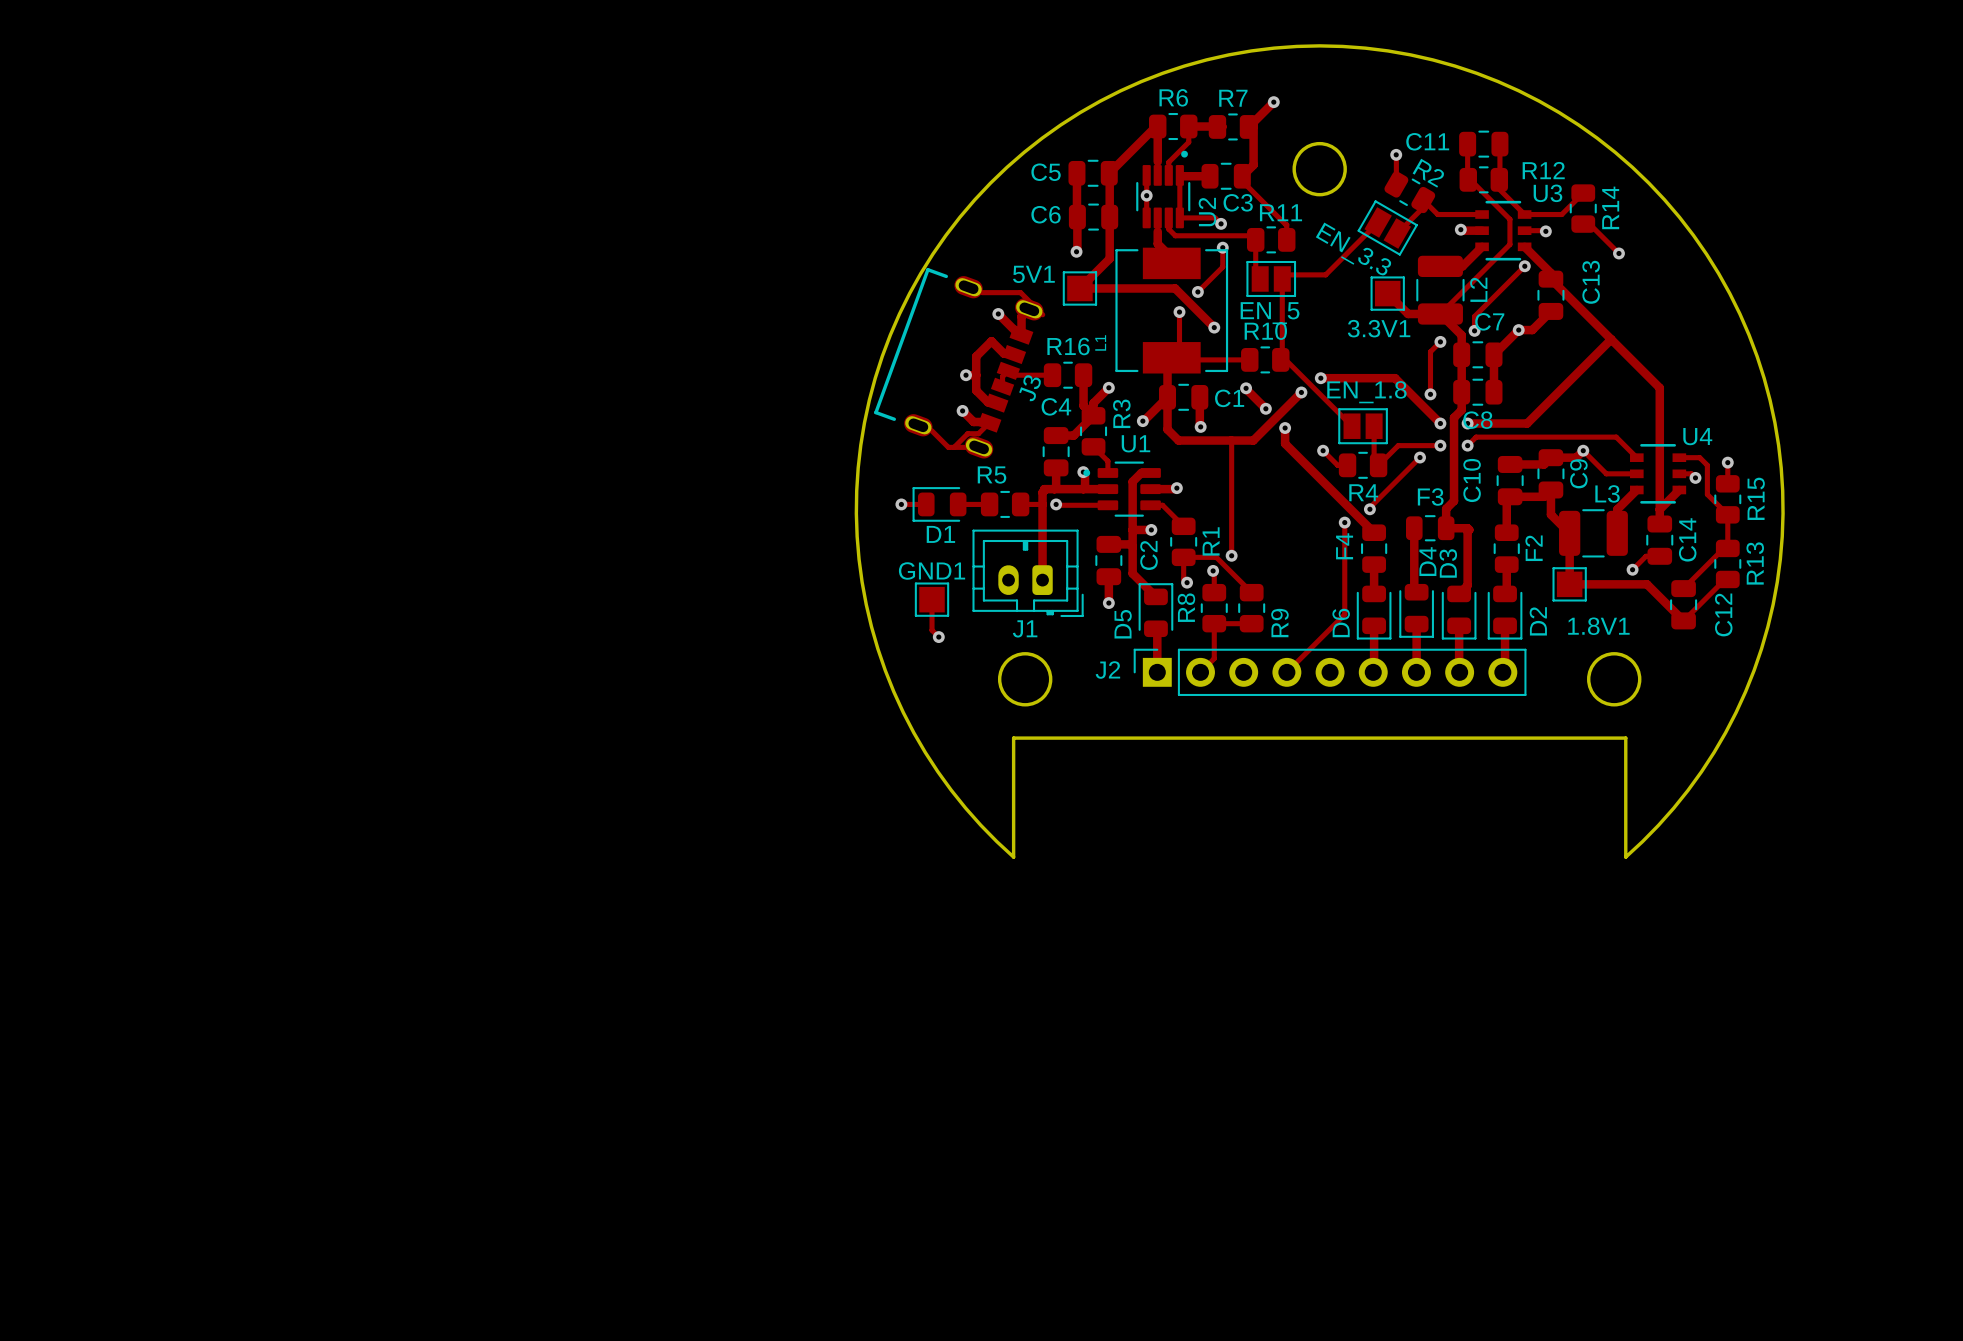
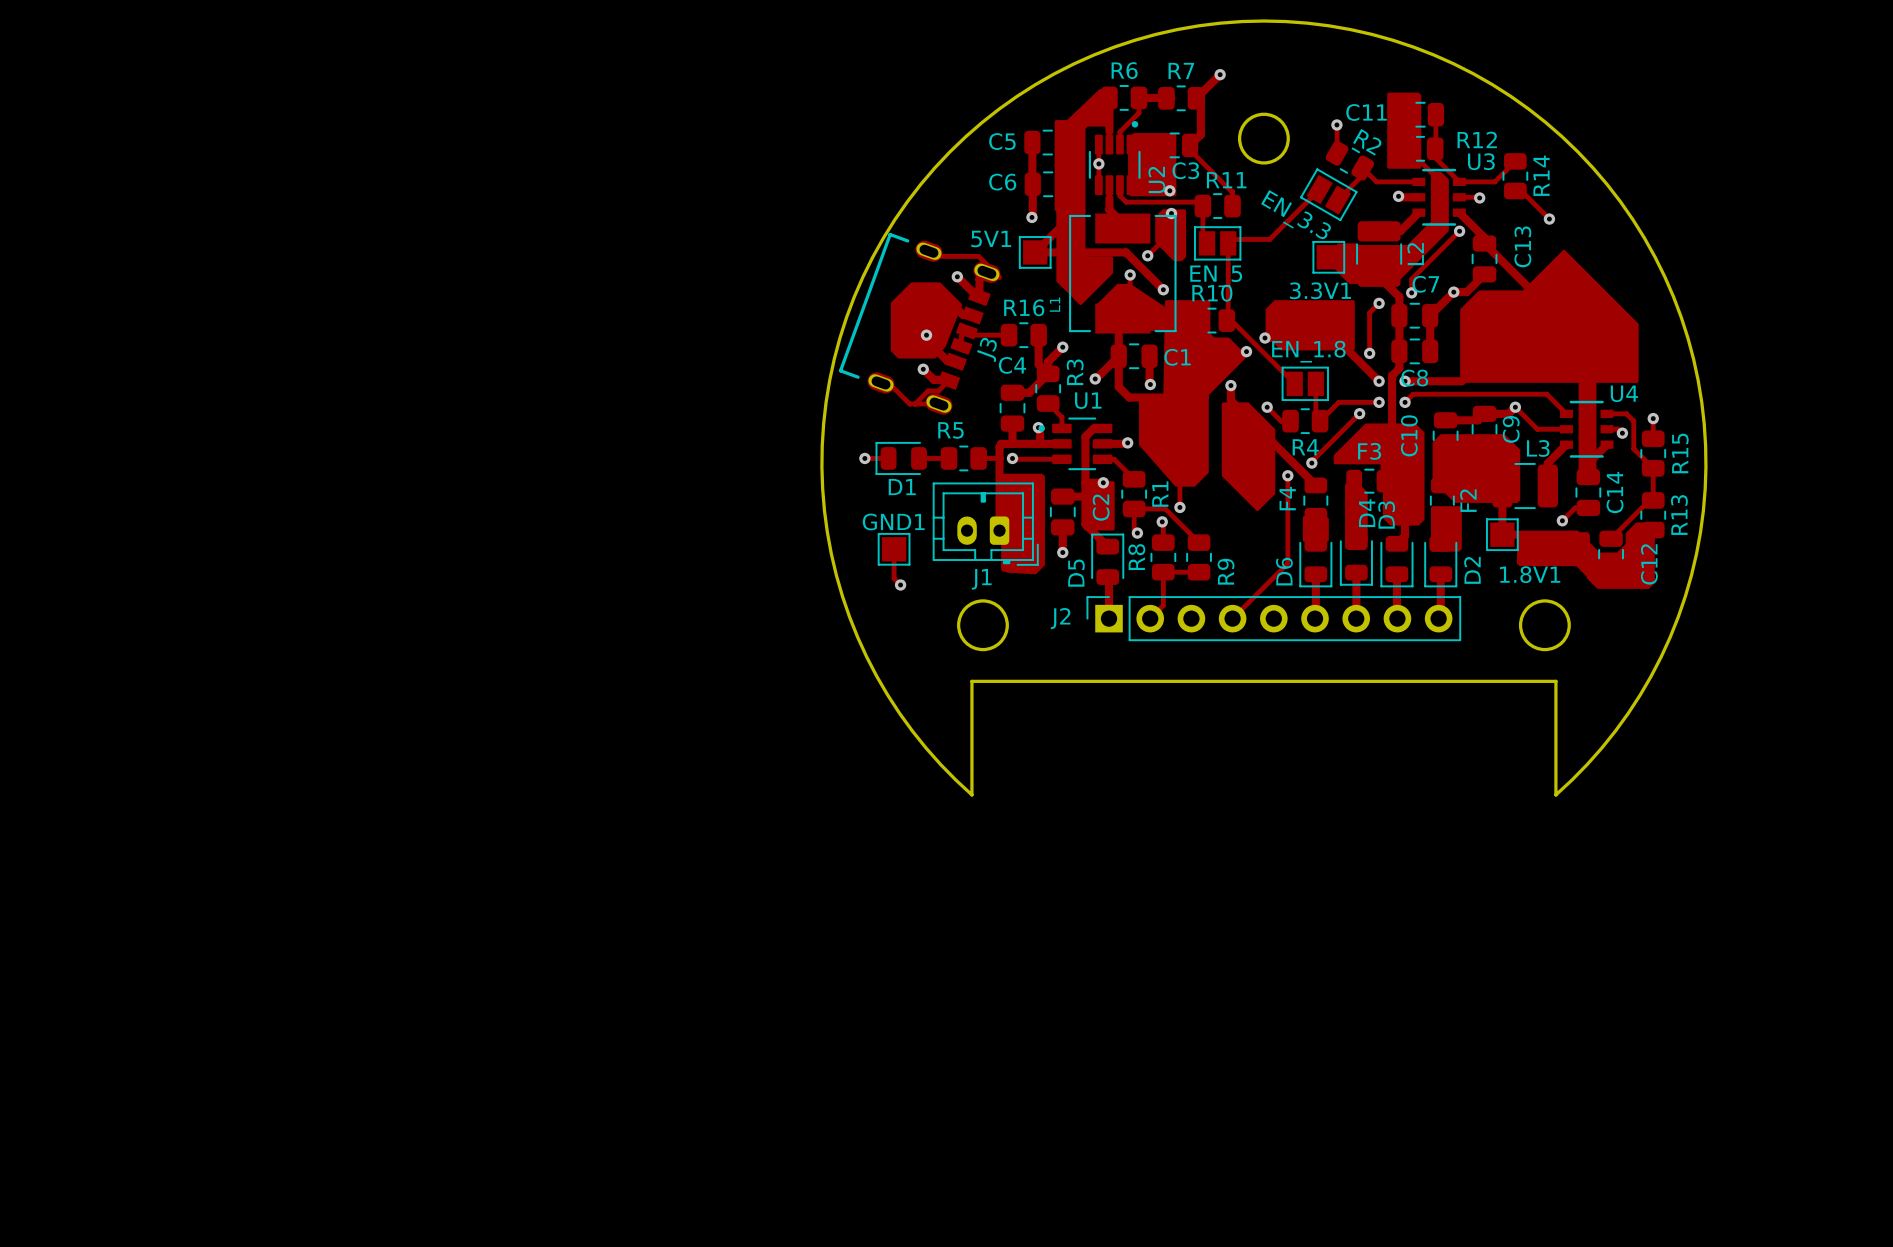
drawing: none -> [1054, 87, 1639, 512]
drawing: none -> [890, 282, 963, 359]
track: (1246, 388) (1265, 408) -> none
via: (1246, 388) -> none
via: (1265, 408) -> none
drawing: none -> [1302, 423, 1521, 552]
drawing: none -> [1001, 473, 1045, 575]
drawing: none -> [1083, 481, 1115, 531]
drawing: none -> [1516, 522, 1655, 589]

